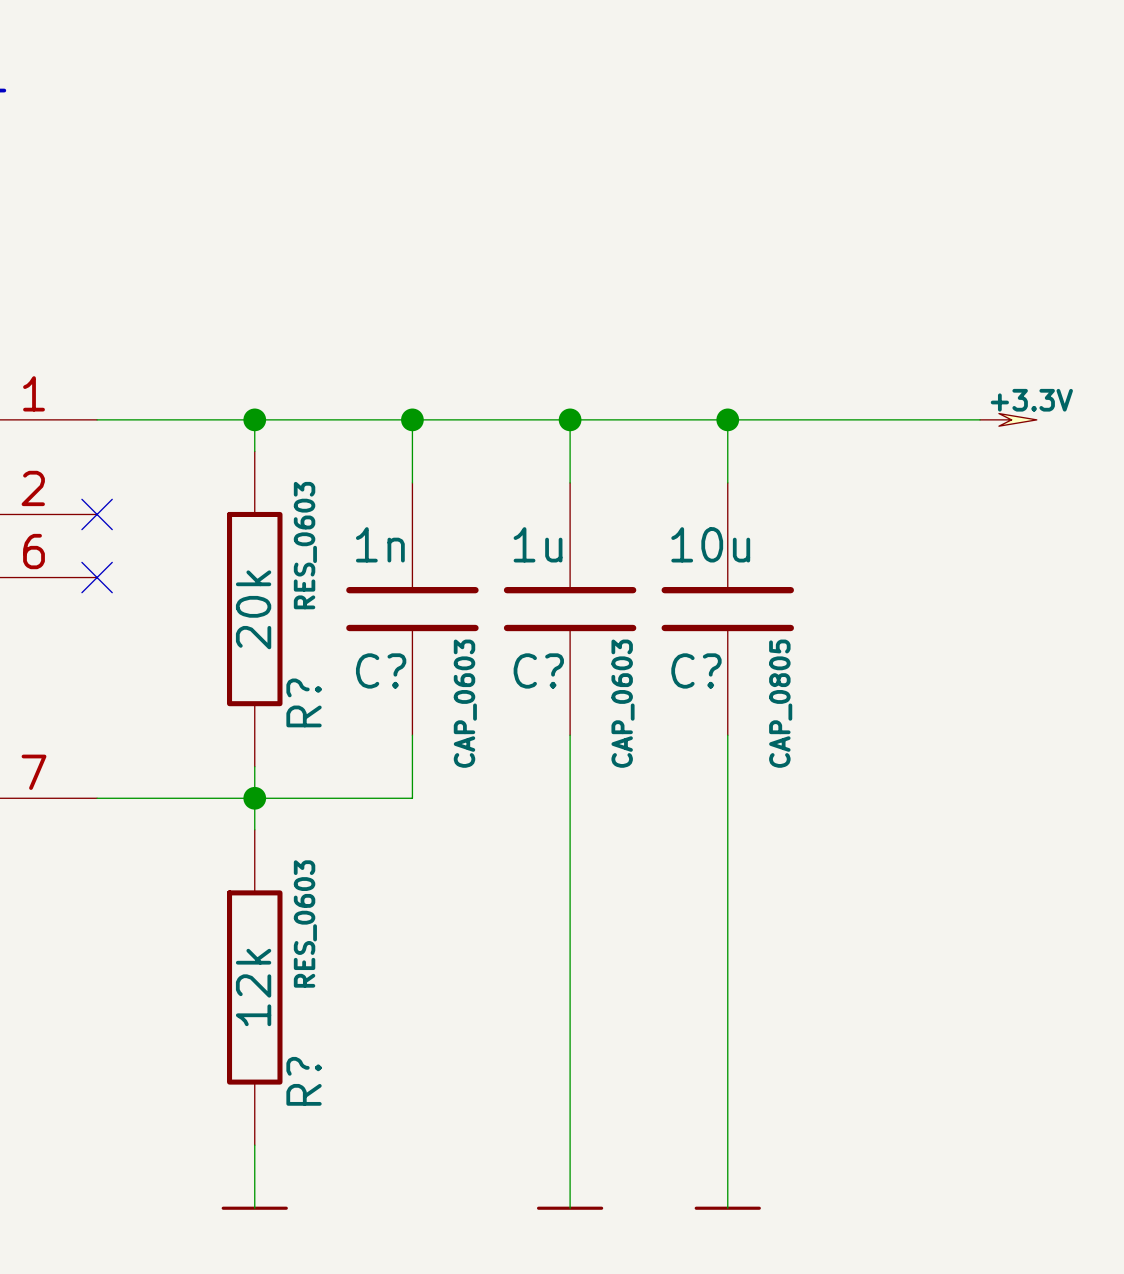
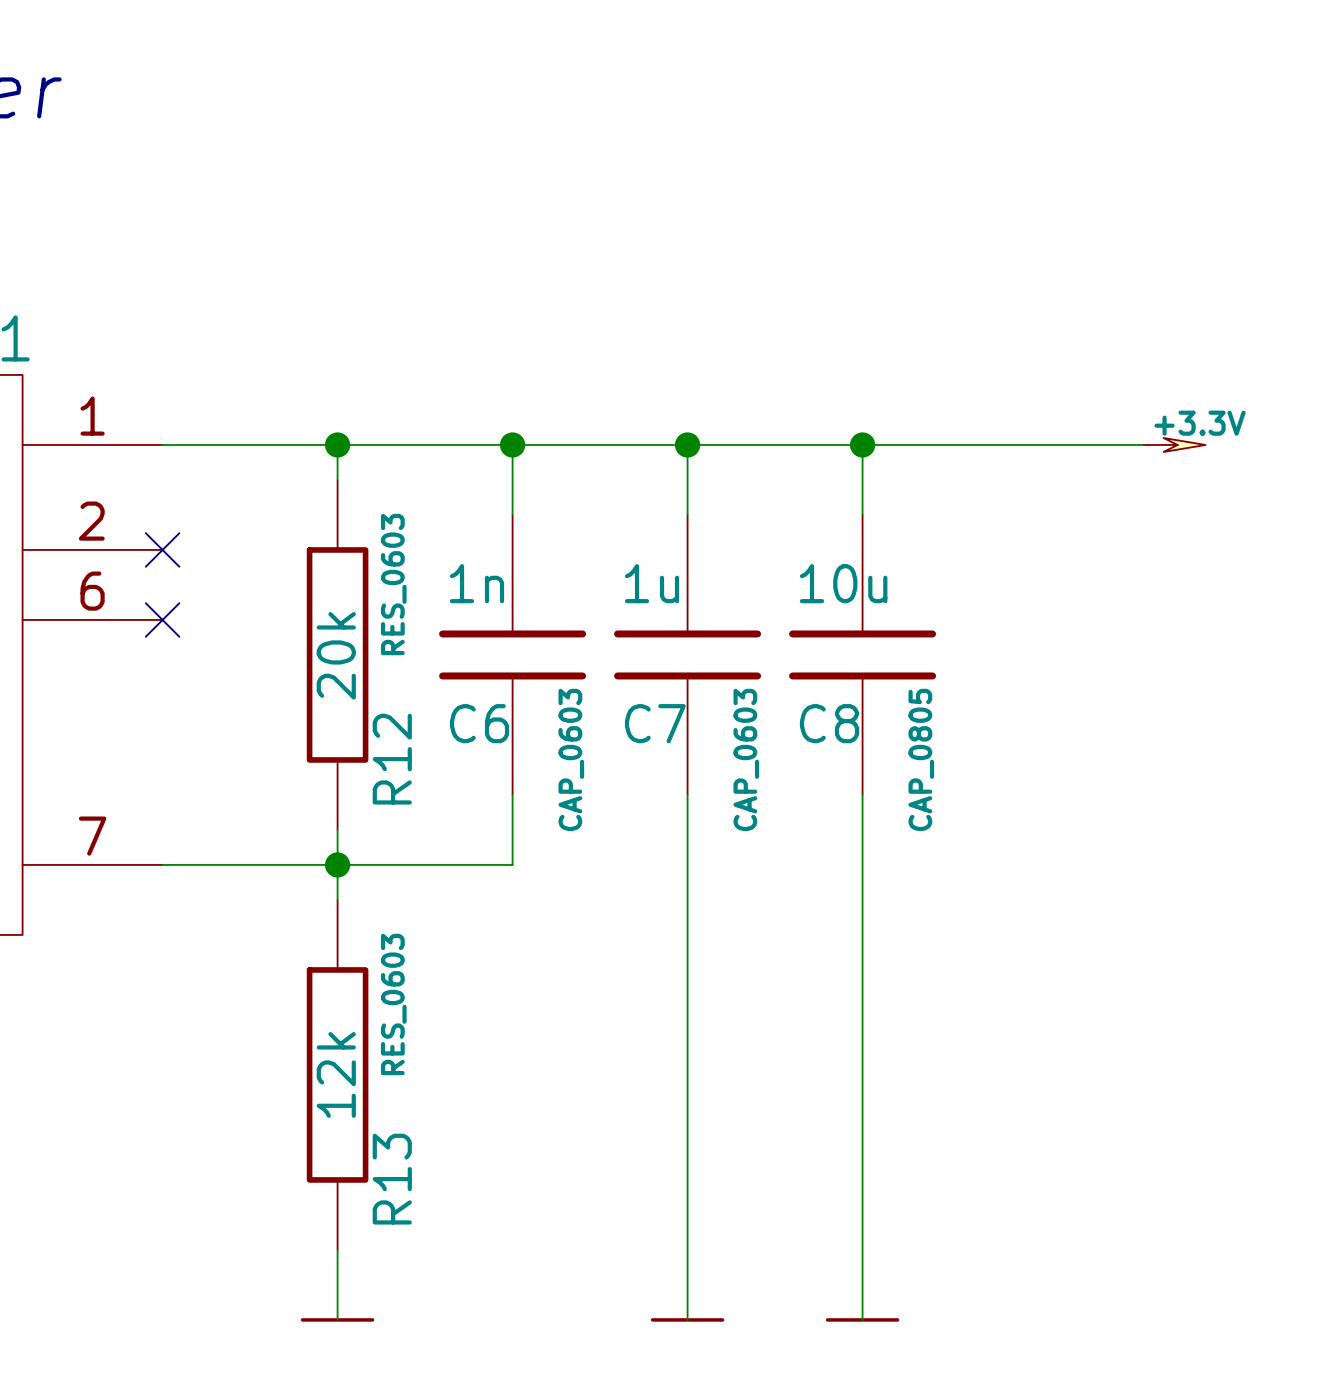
C? name: C? (381, 670) -> C6 (479, 723)
C? name: C? (538, 670) -> C7 (655, 723)
C? name: C? (696, 670) -> C8 (829, 723)
R? name: R? (304, 702) -> R12 (392, 759)
R? name: R? (304, 1081) -> R13 (392, 1179)

